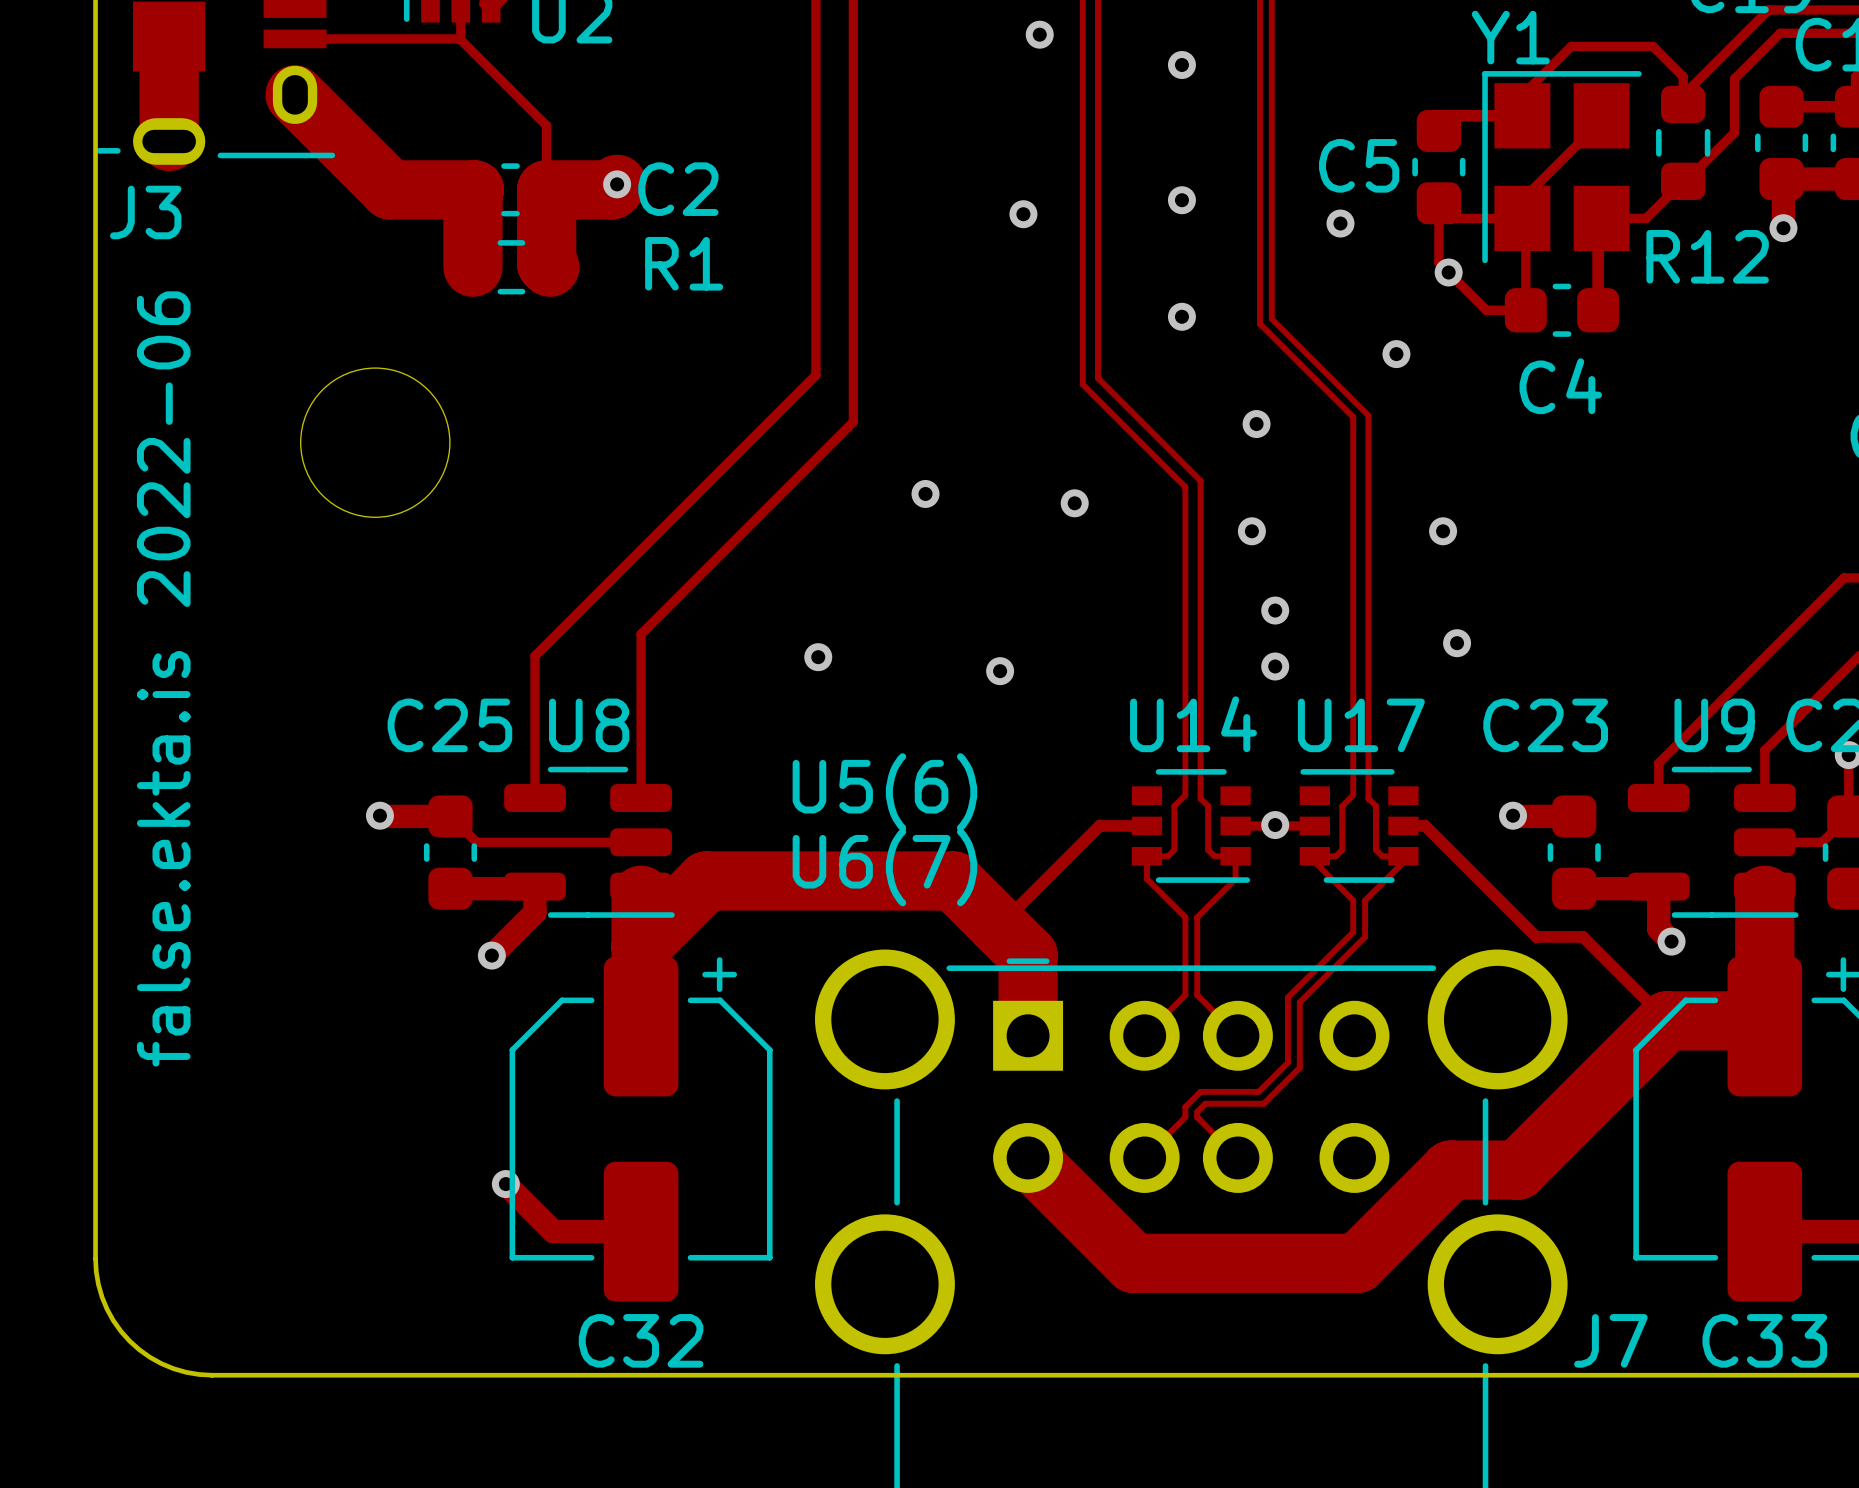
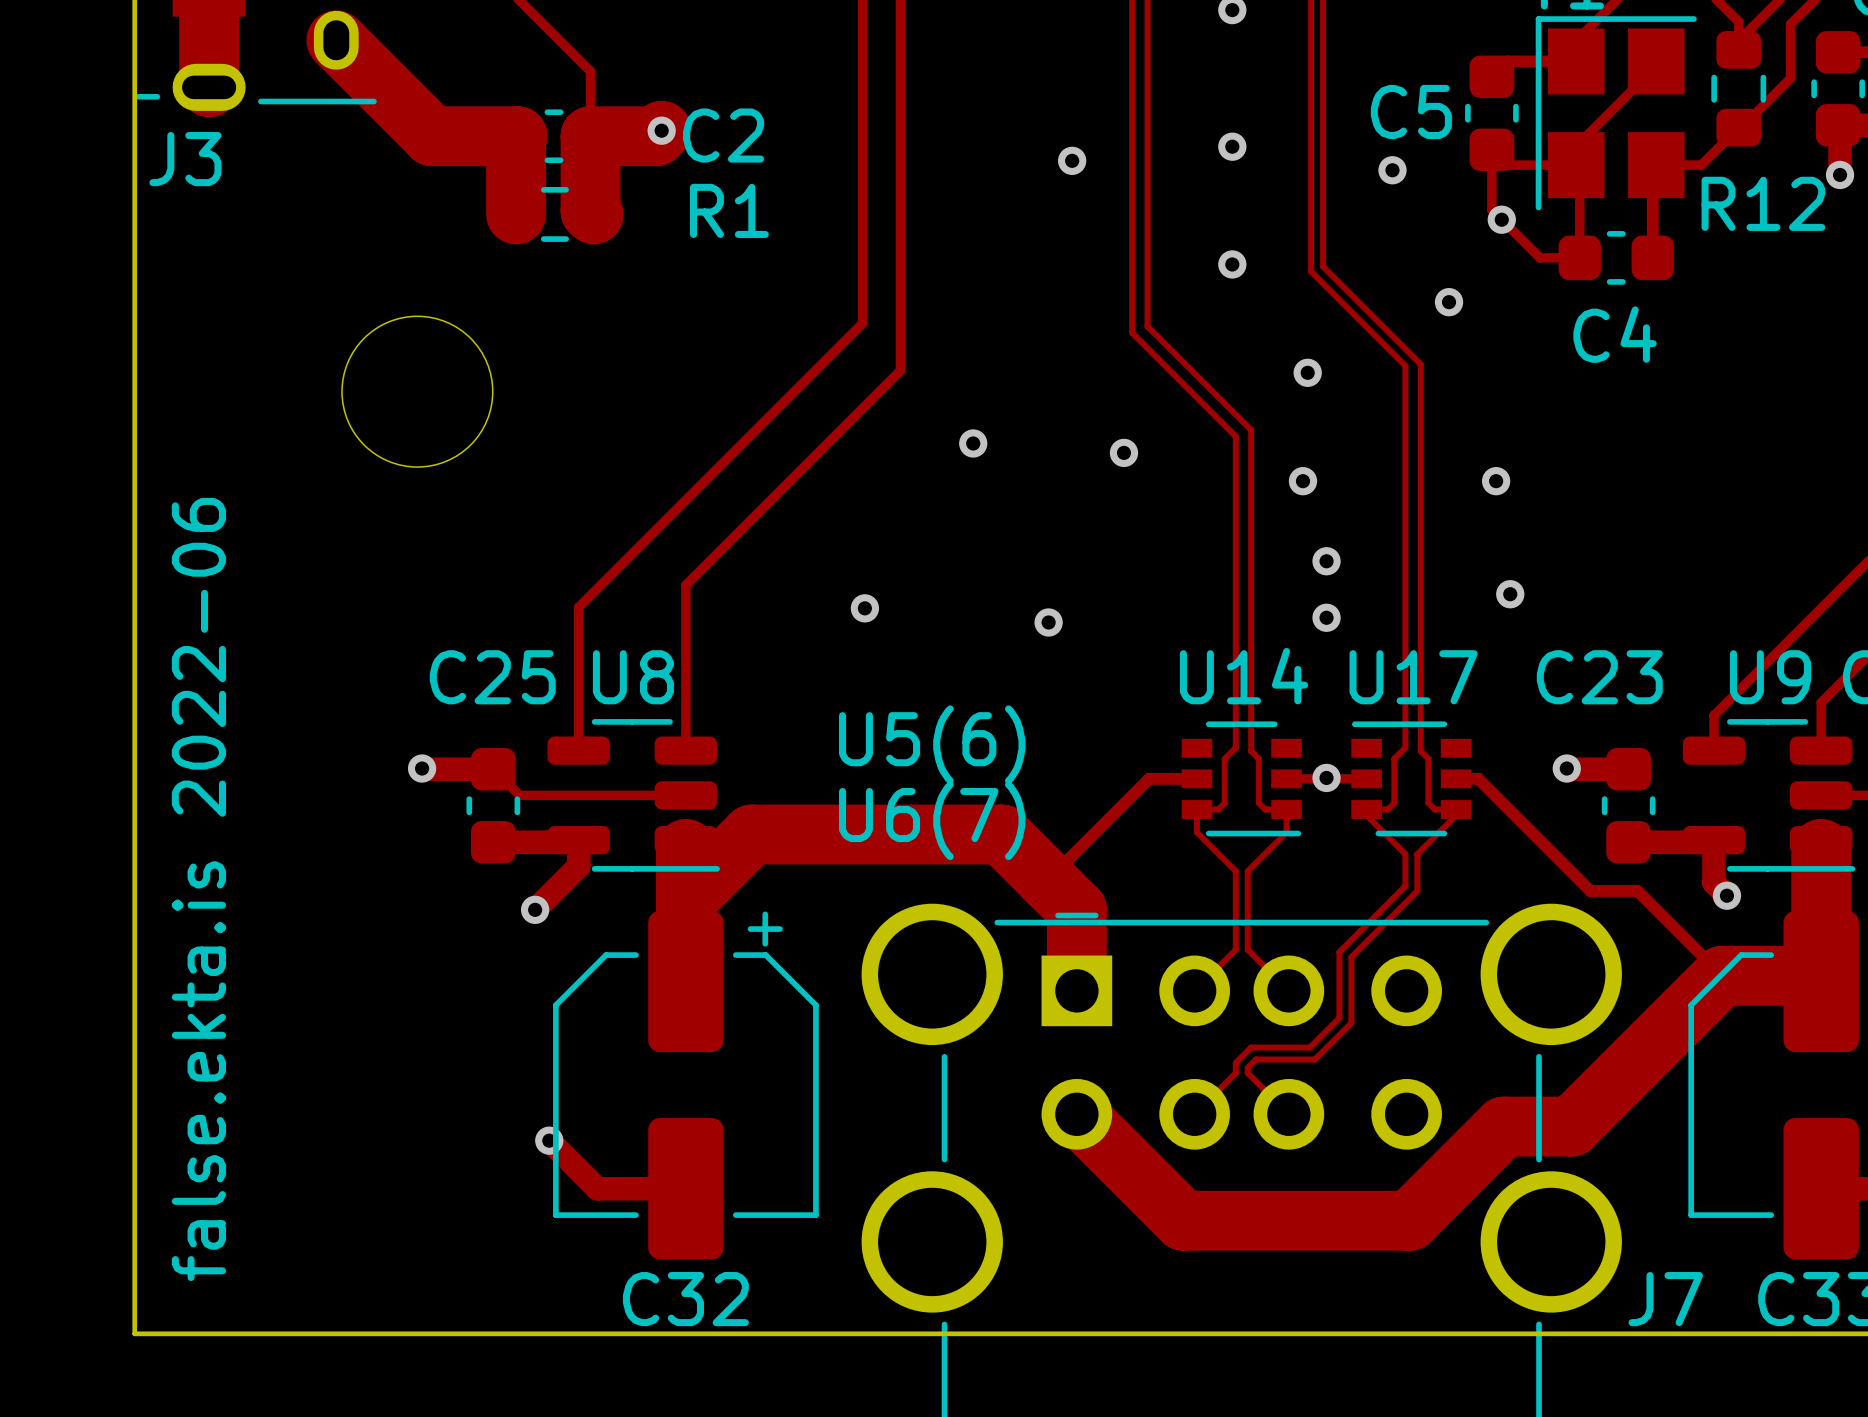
text position: false.ekta.is 2022-06 (163, 678) -> false.ekta.is 2022-06 (198, 889)
board edge: (95, 1258) (98, 1284) (107, 1309) (129, 1341) (150, 1357) (173, 1368) (212, 1375) -> (134, 1216) (134, 1333) (252, 1333)

